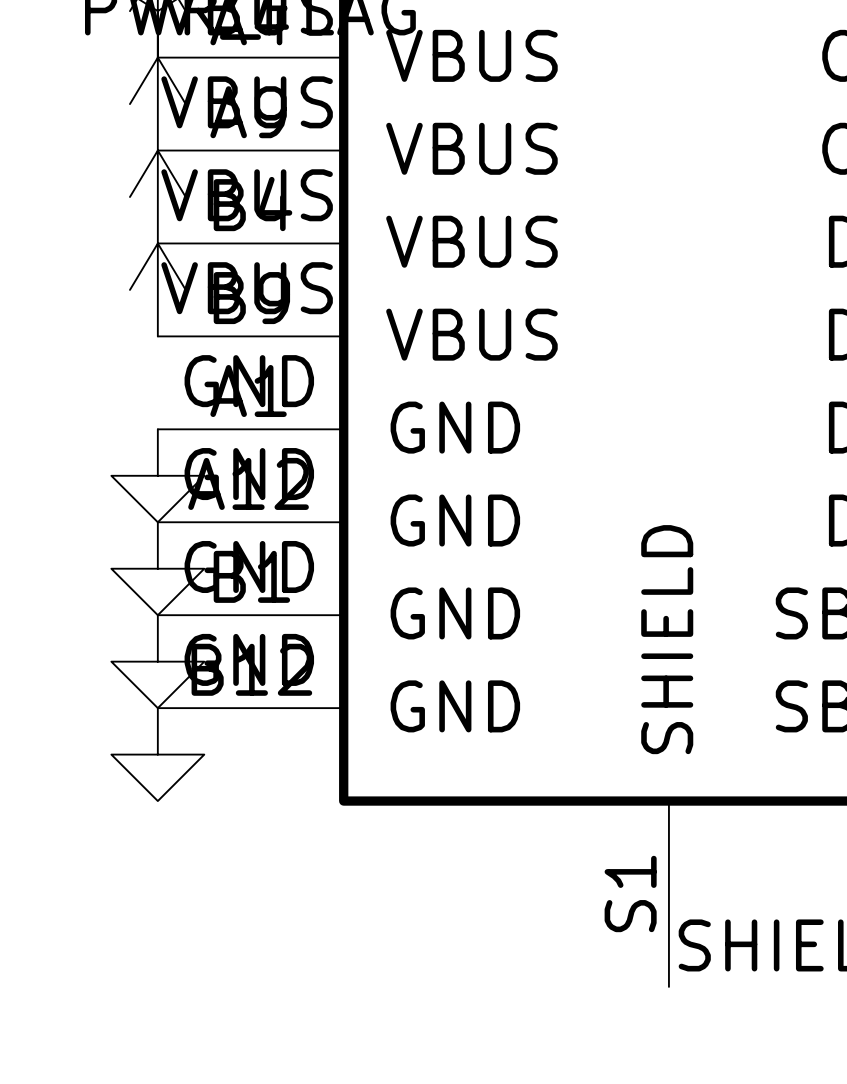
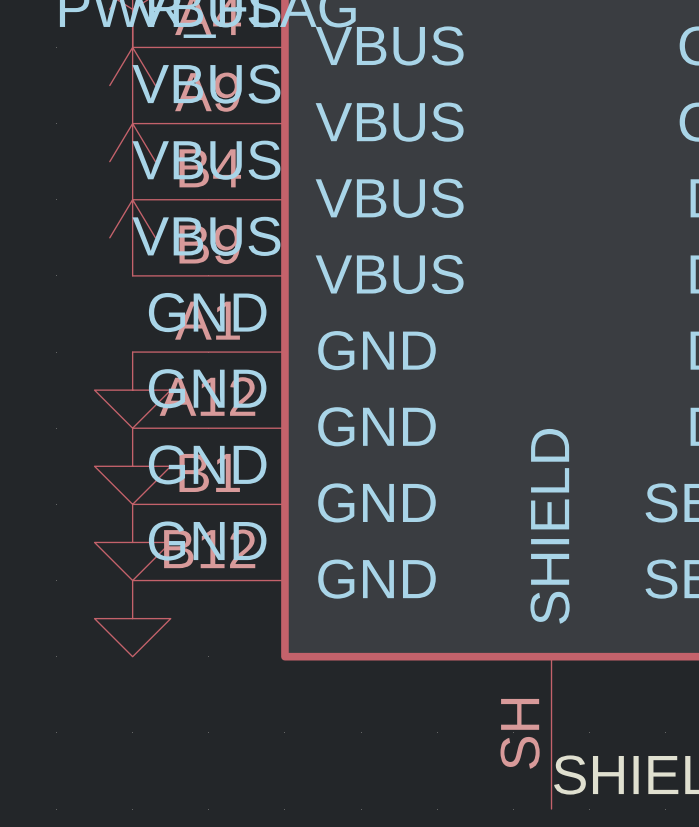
part pin number: S1 (630, 893) -> SH (520, 733)

